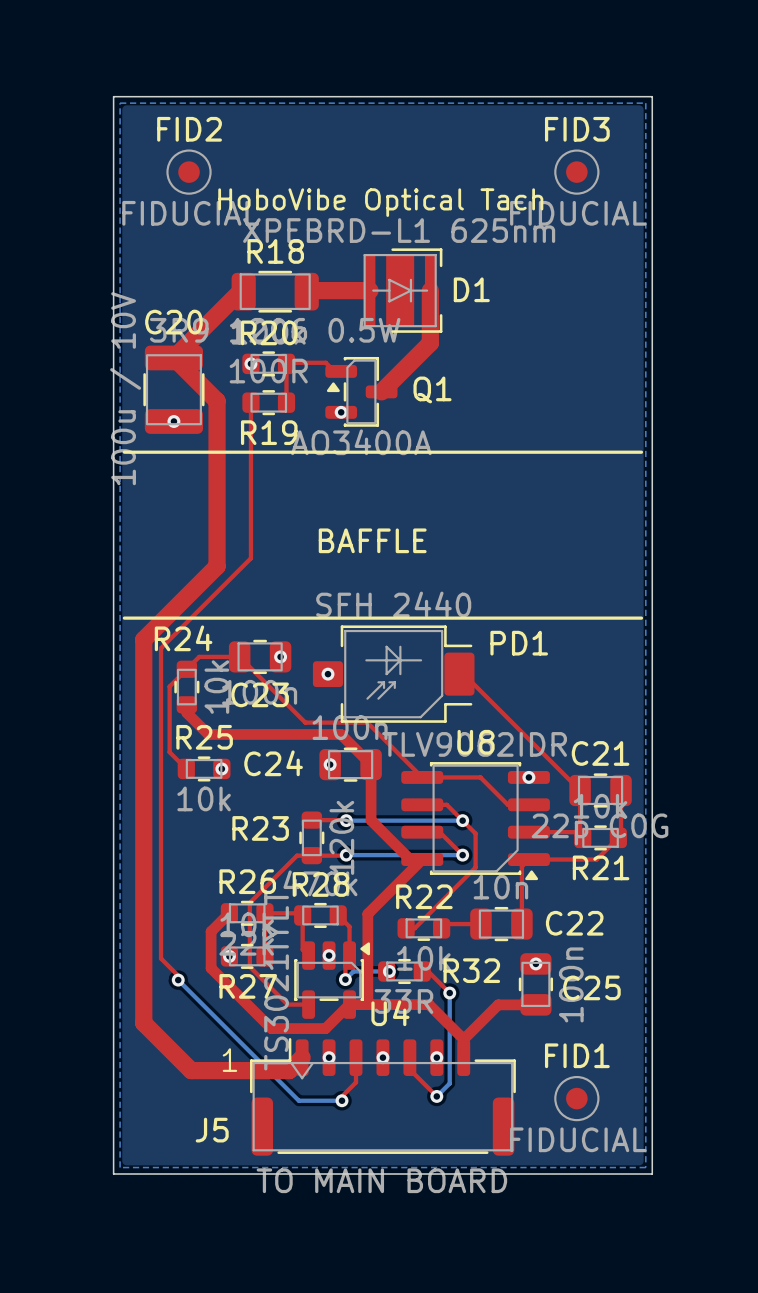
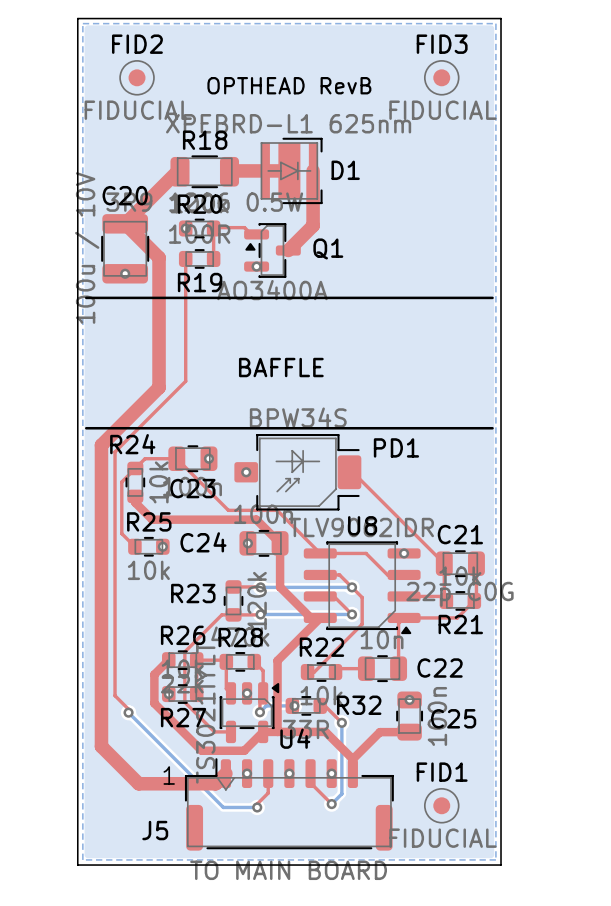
text: HoboVibe Optical Tach (380, 202) -> OPTHEAD RevB (289, 85)
D1 position: (402, 290) -> (291, 170)
top track: (430, 290) (430, 343) (413, 360) -> (313, 170) (313, 225)
PD1 value: SFH 2440 (393, 604) -> BPW34S (298, 417)

